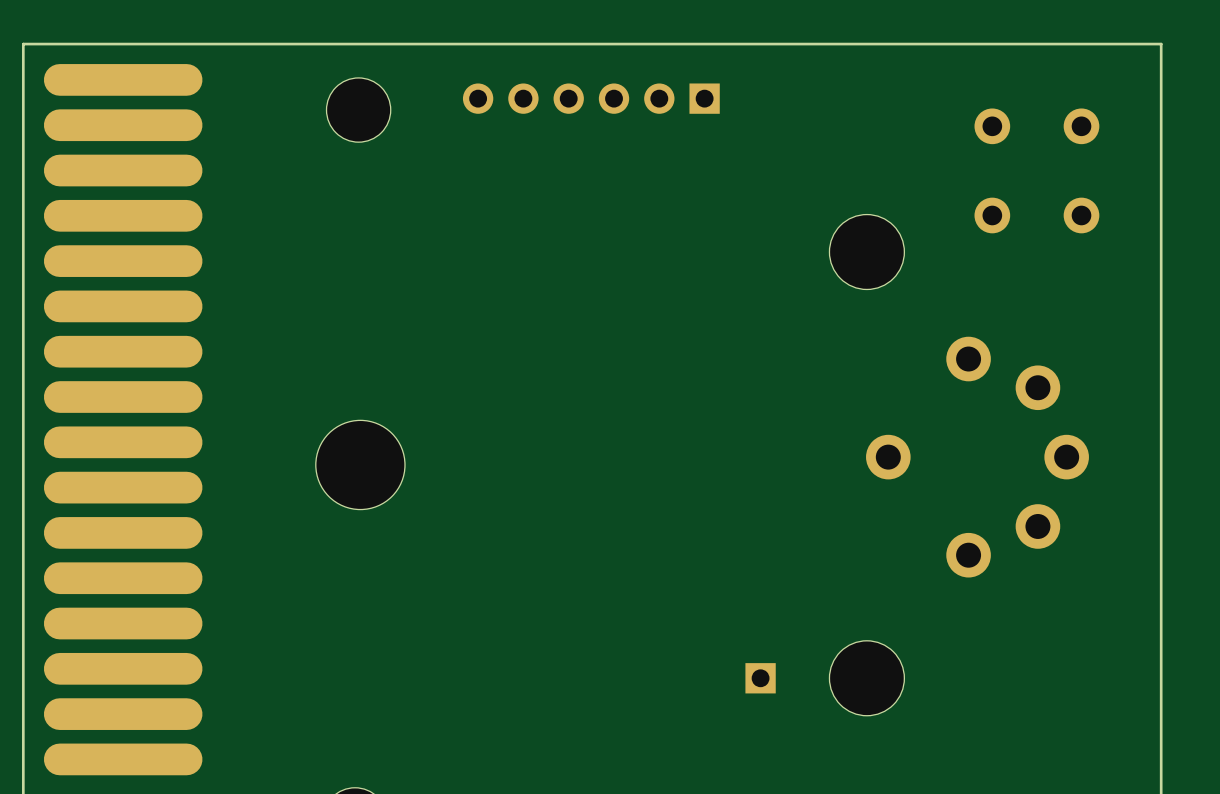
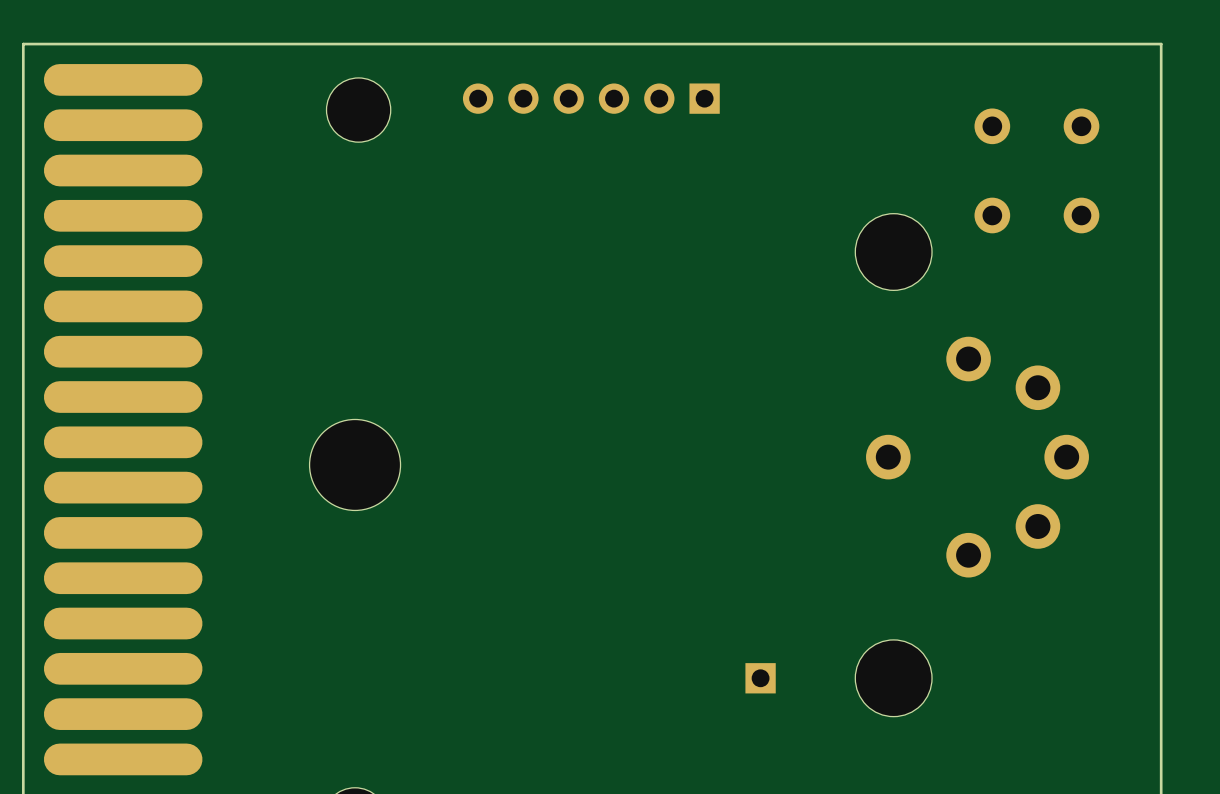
part: (866, 252) -> none
part: none -> (893, 252)
part footprint: [315, 420, 405, 510] -> [309, 419, 401, 511]
part: (866, 678) -> none
part: none -> (893, 678)

